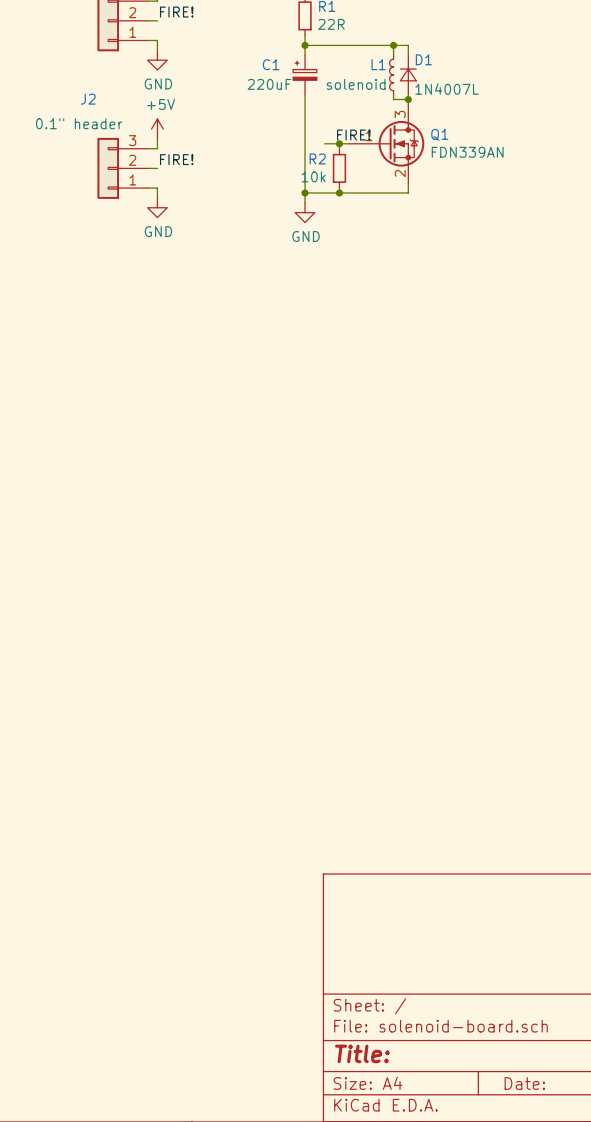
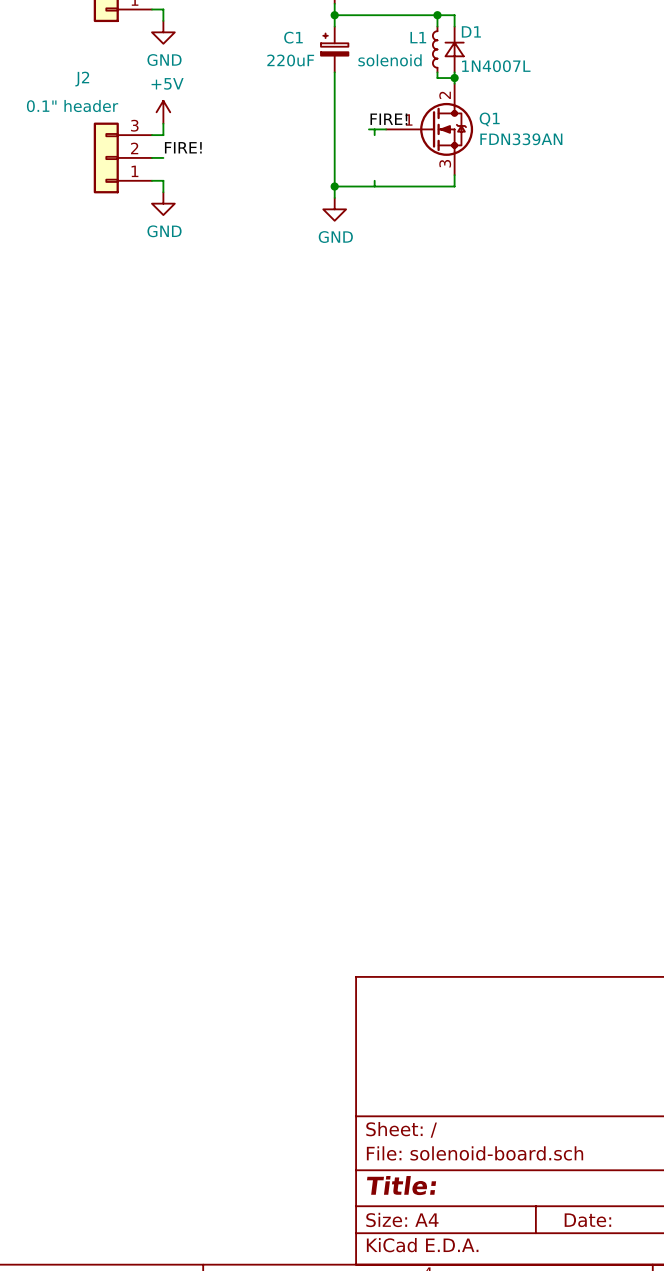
Q1 pin number: 3 (400, 114) -> 2 (445, 95)
wire: (324, 143) (334, 143) -> none
junction: (339, 143) -> none
R2: 10k (339, 168) -> none
Q1 pin number: 2 (400, 173) -> 3 (445, 163)
junction: (339, 192) -> none

